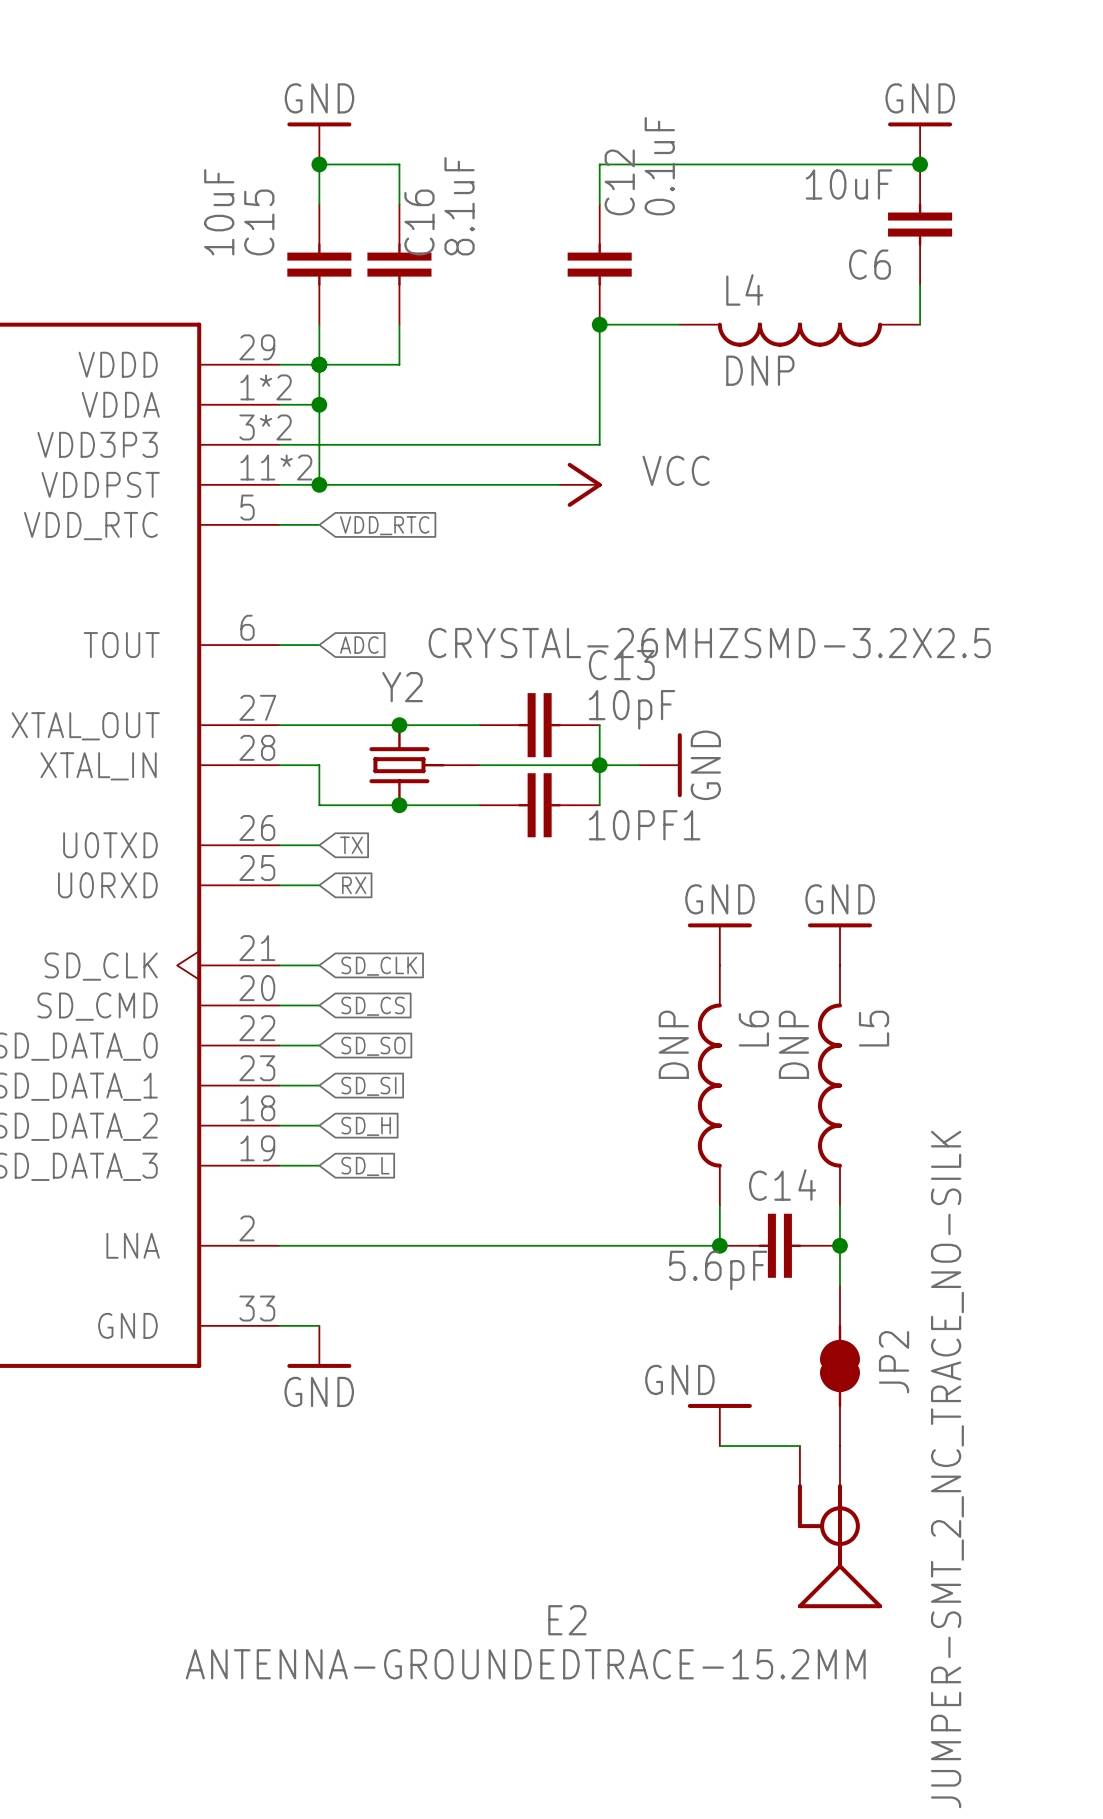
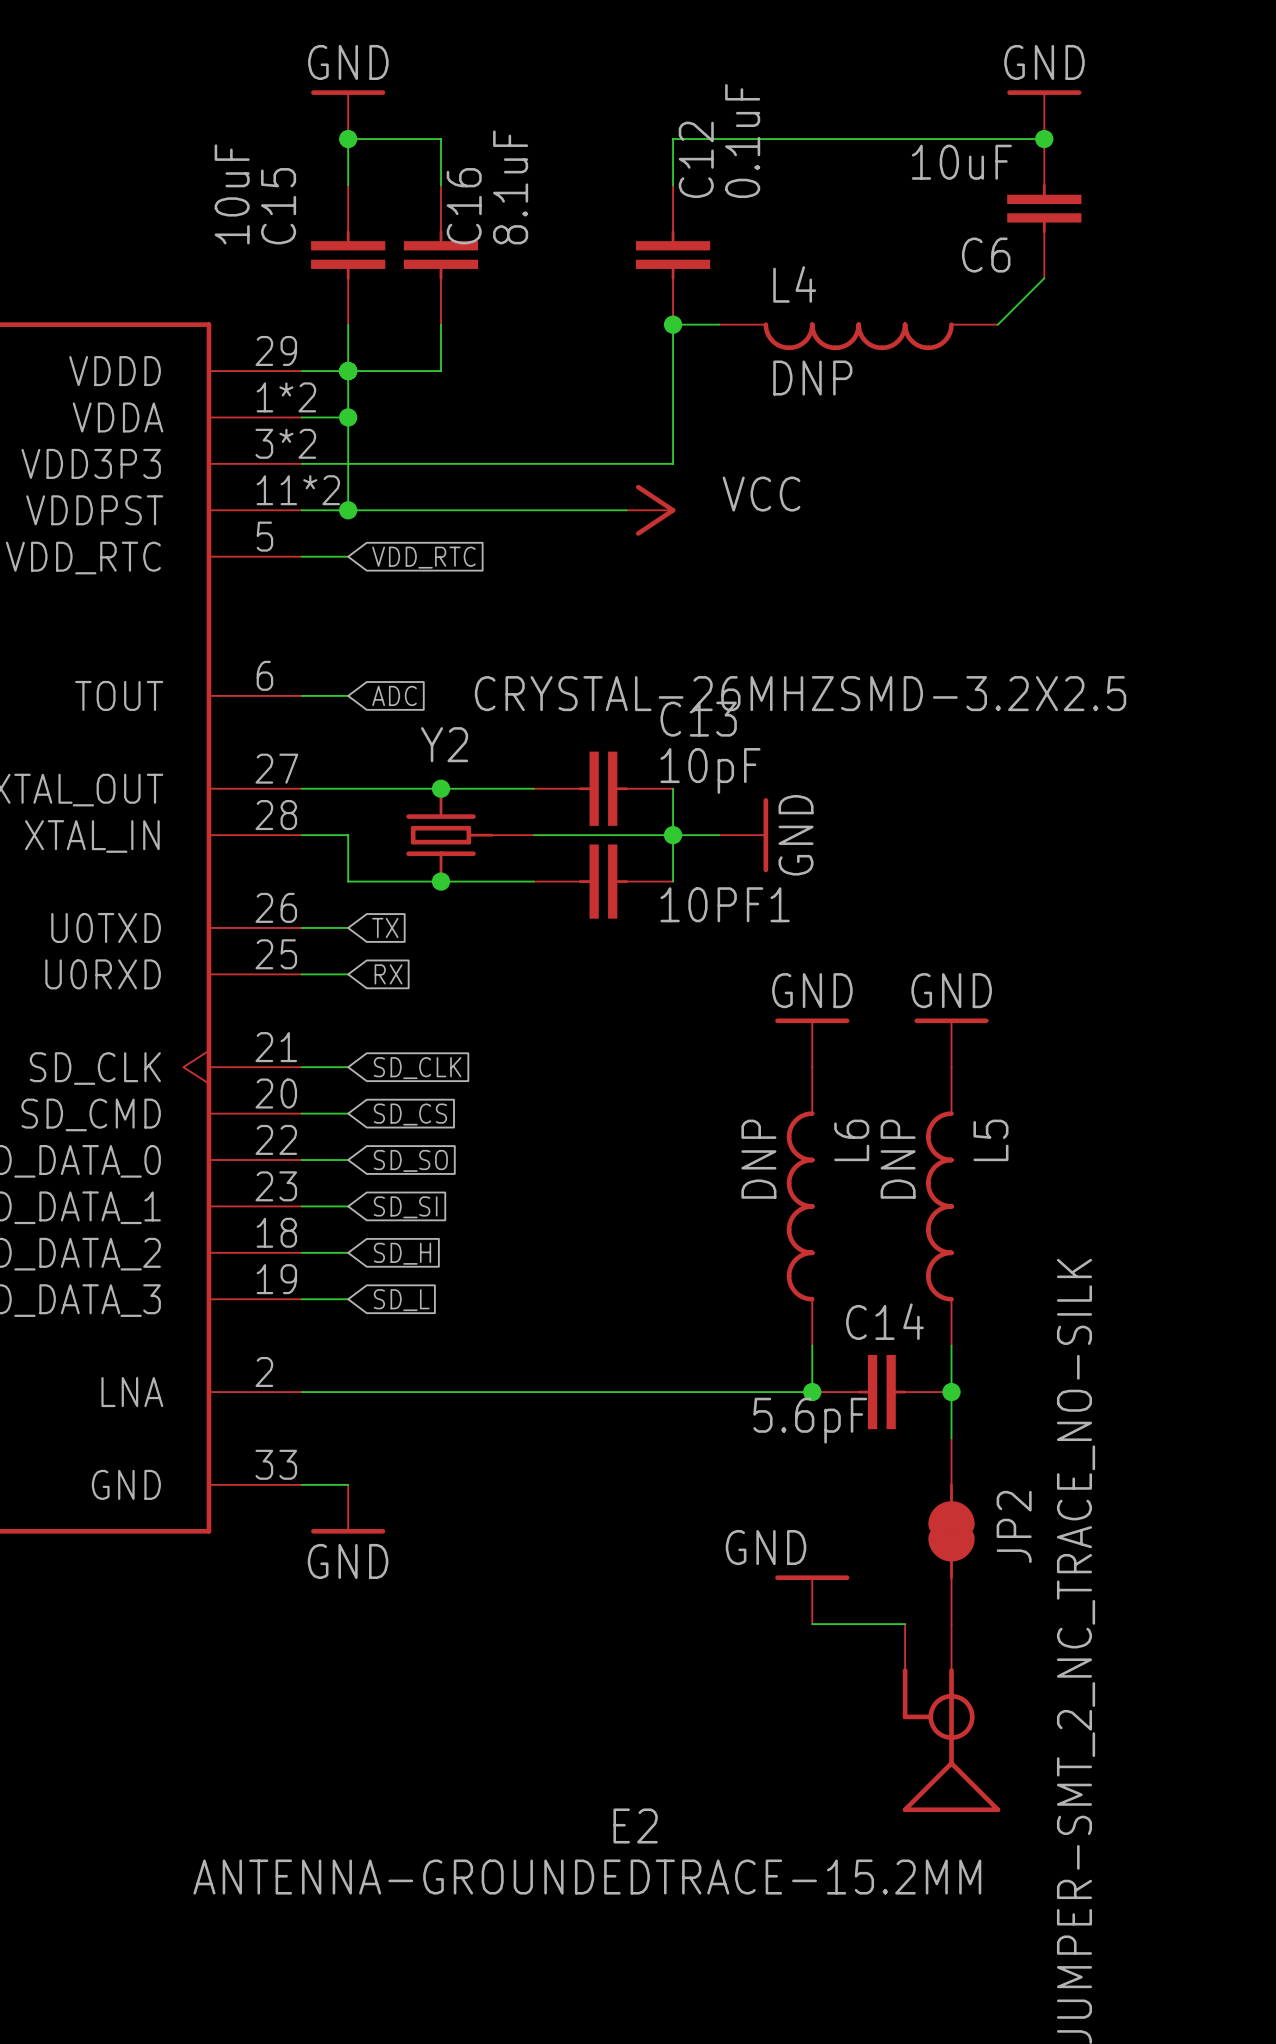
wire: (920, 284) (920, 324) -> (1044, 278) (997, 324)
L4 position: (799, 334) -> (858, 336)

